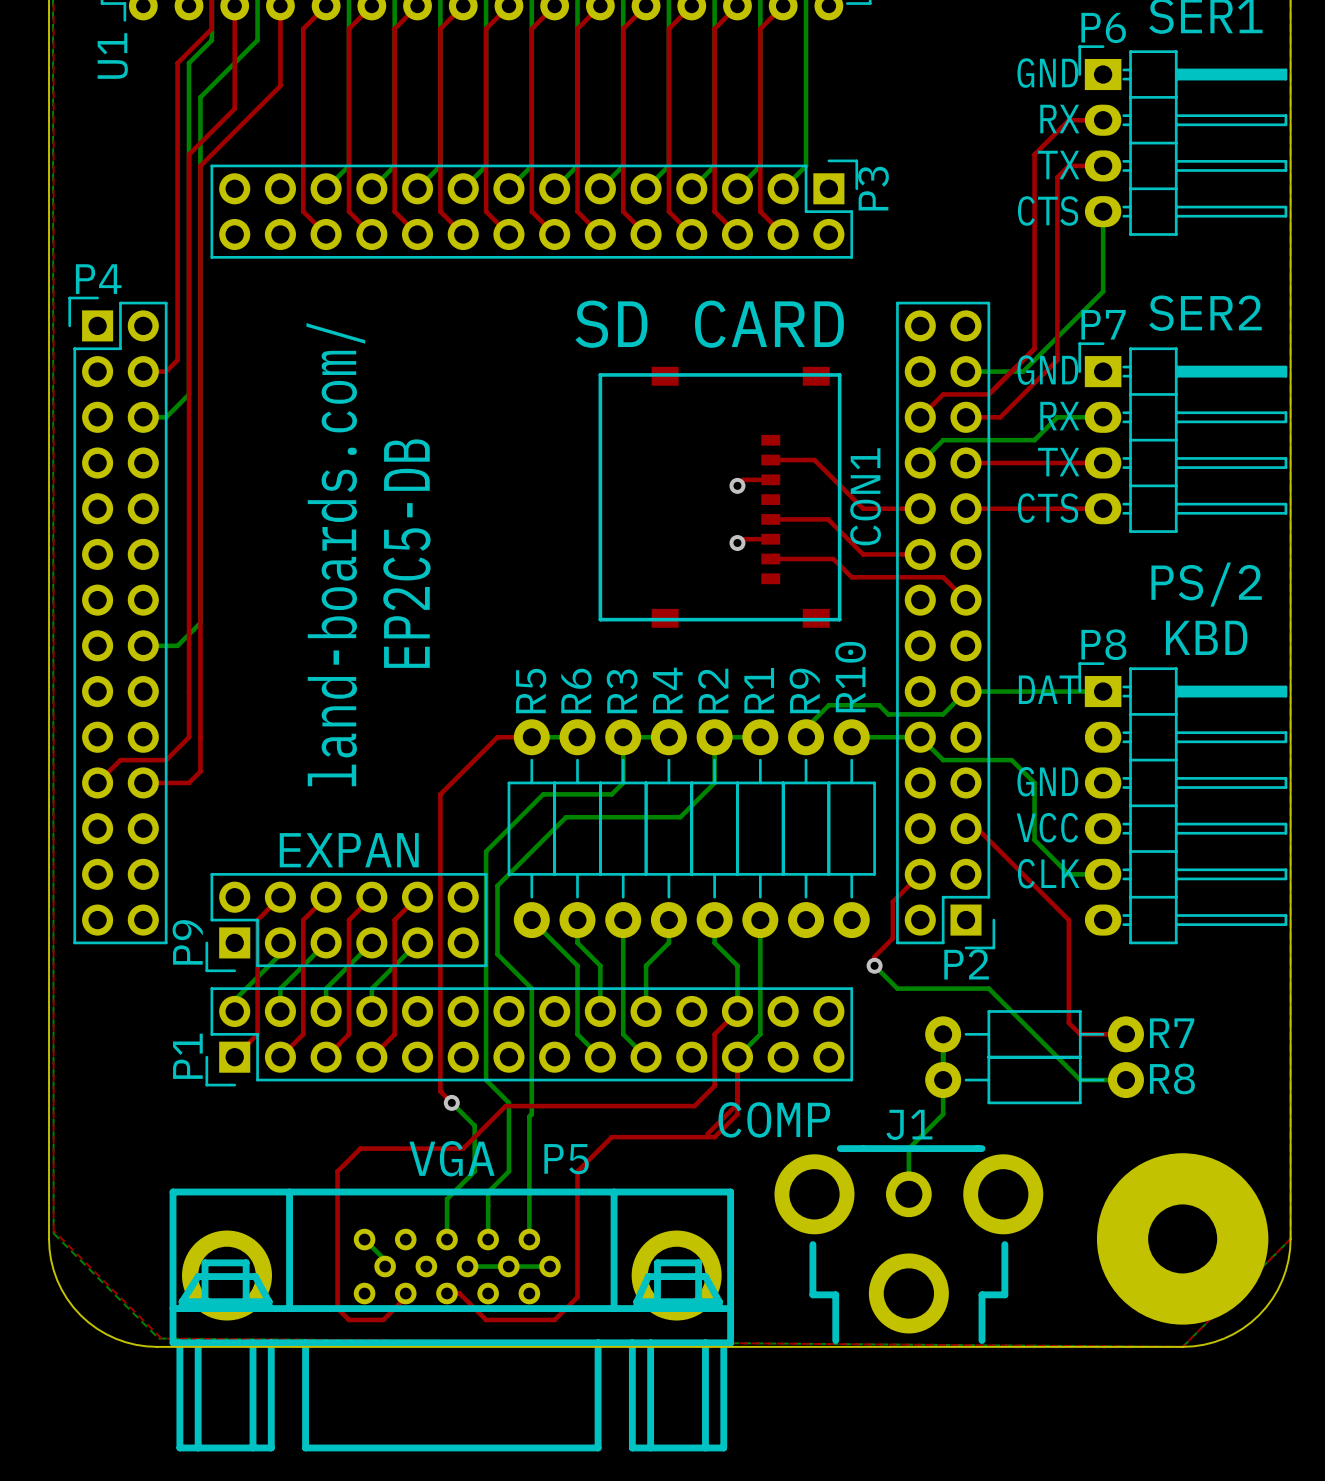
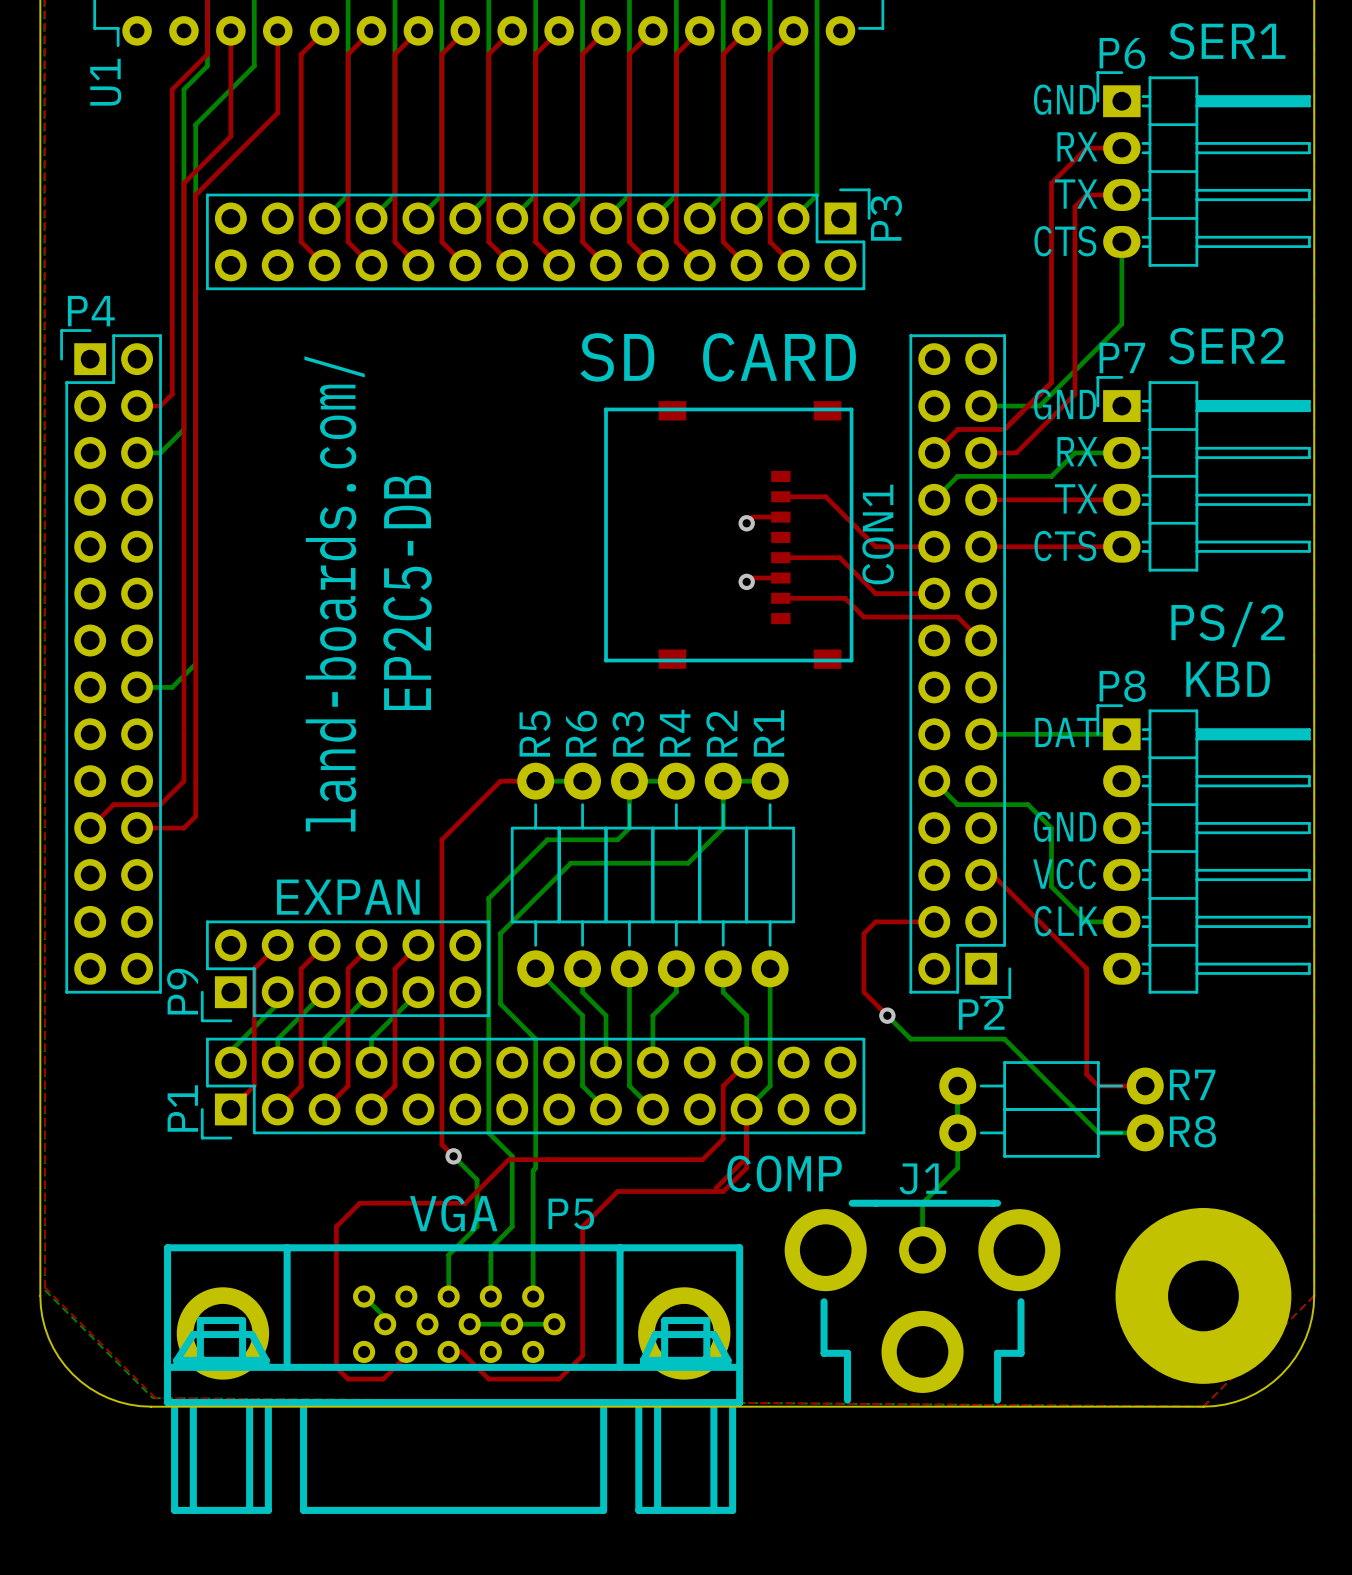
bottom track: (966, 691) (943, 714) (888, 714) (879, 705) (828, 705) (806, 728) (806, 737) -> none
bottom track: (851, 737) (920, 737) -> none
R9: (806, 828) -> none
R10: (851, 828) -> none
top track: (920, 874) (892, 901) (892, 938) (874, 956) (874, 965) -> (934, 921) (875, 921) (863, 933) (863, 992) (887, 1015)

